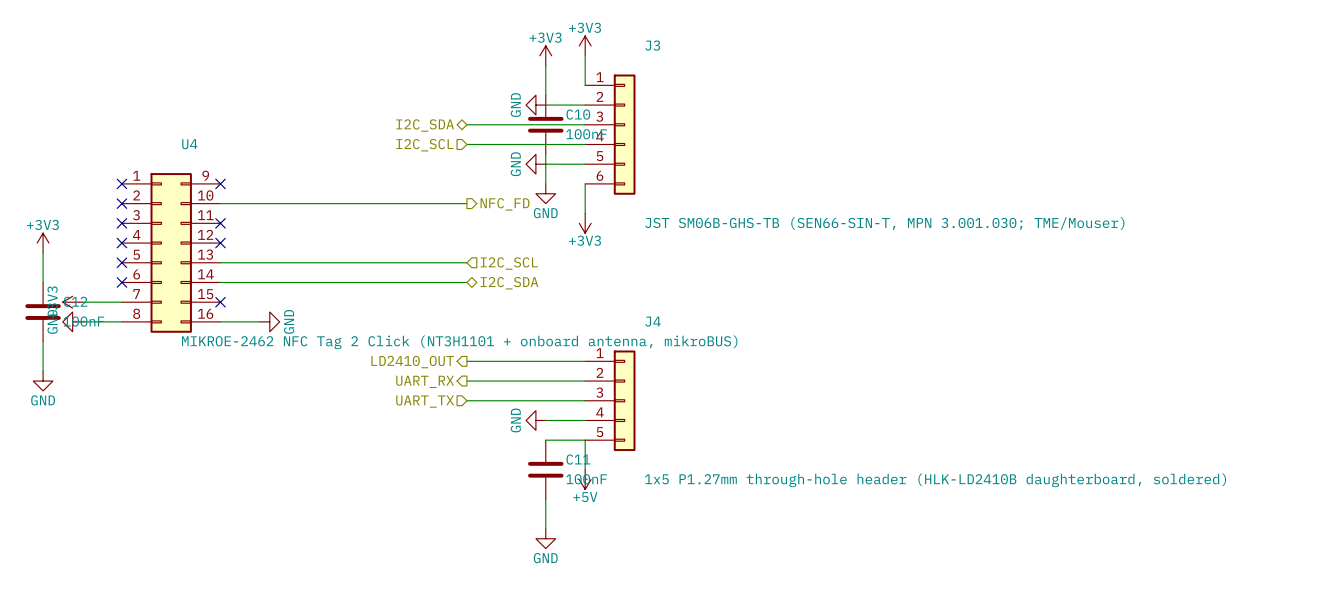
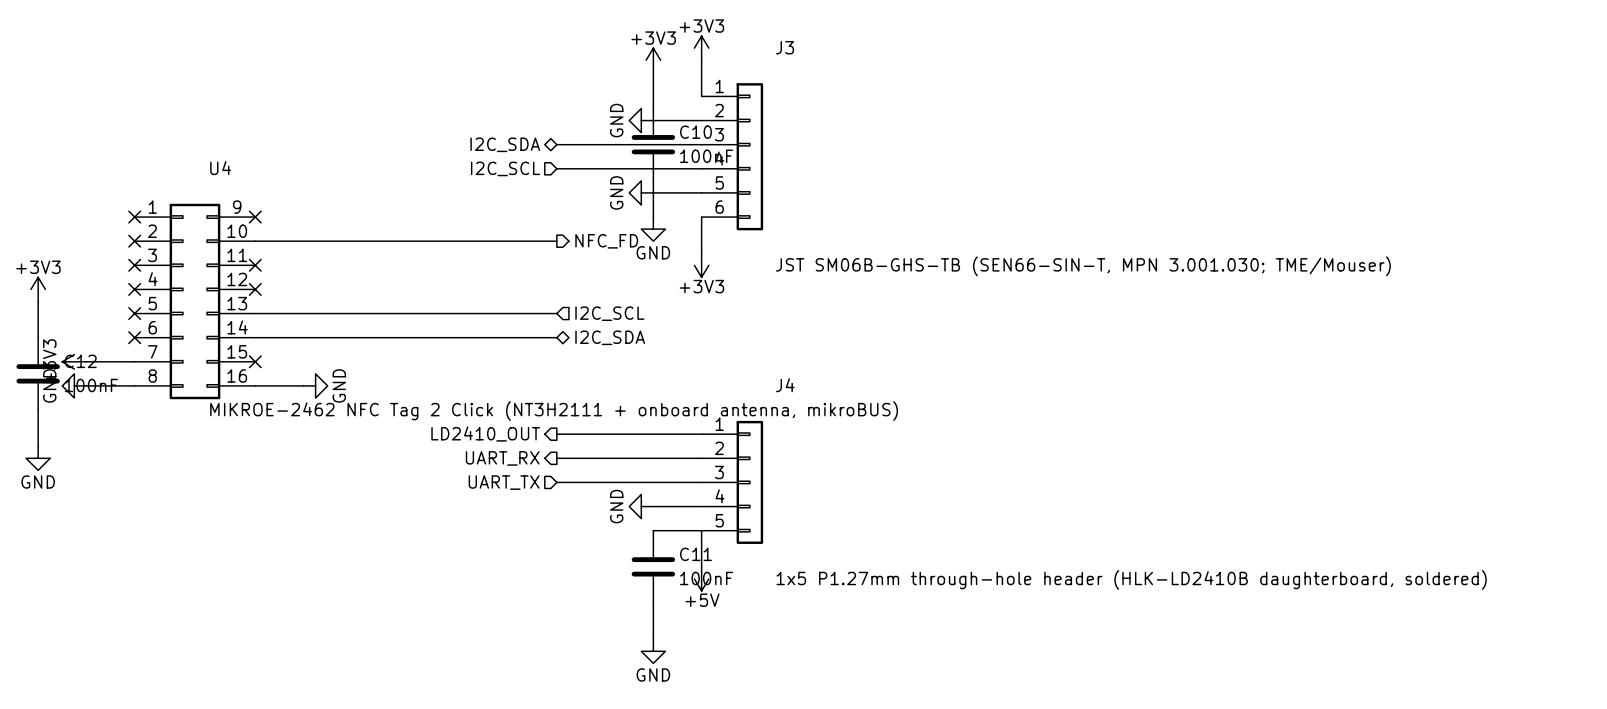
U4 value: MIKROE-2462 NFC Tag 2 Click (NT3H1101 + onboard antenna, mikroBUS) (459, 342) -> MIKROE-2462 NFC Tag 2 Click (NT3H2111 + onboard antenna, mikroBUS) (554, 411)

